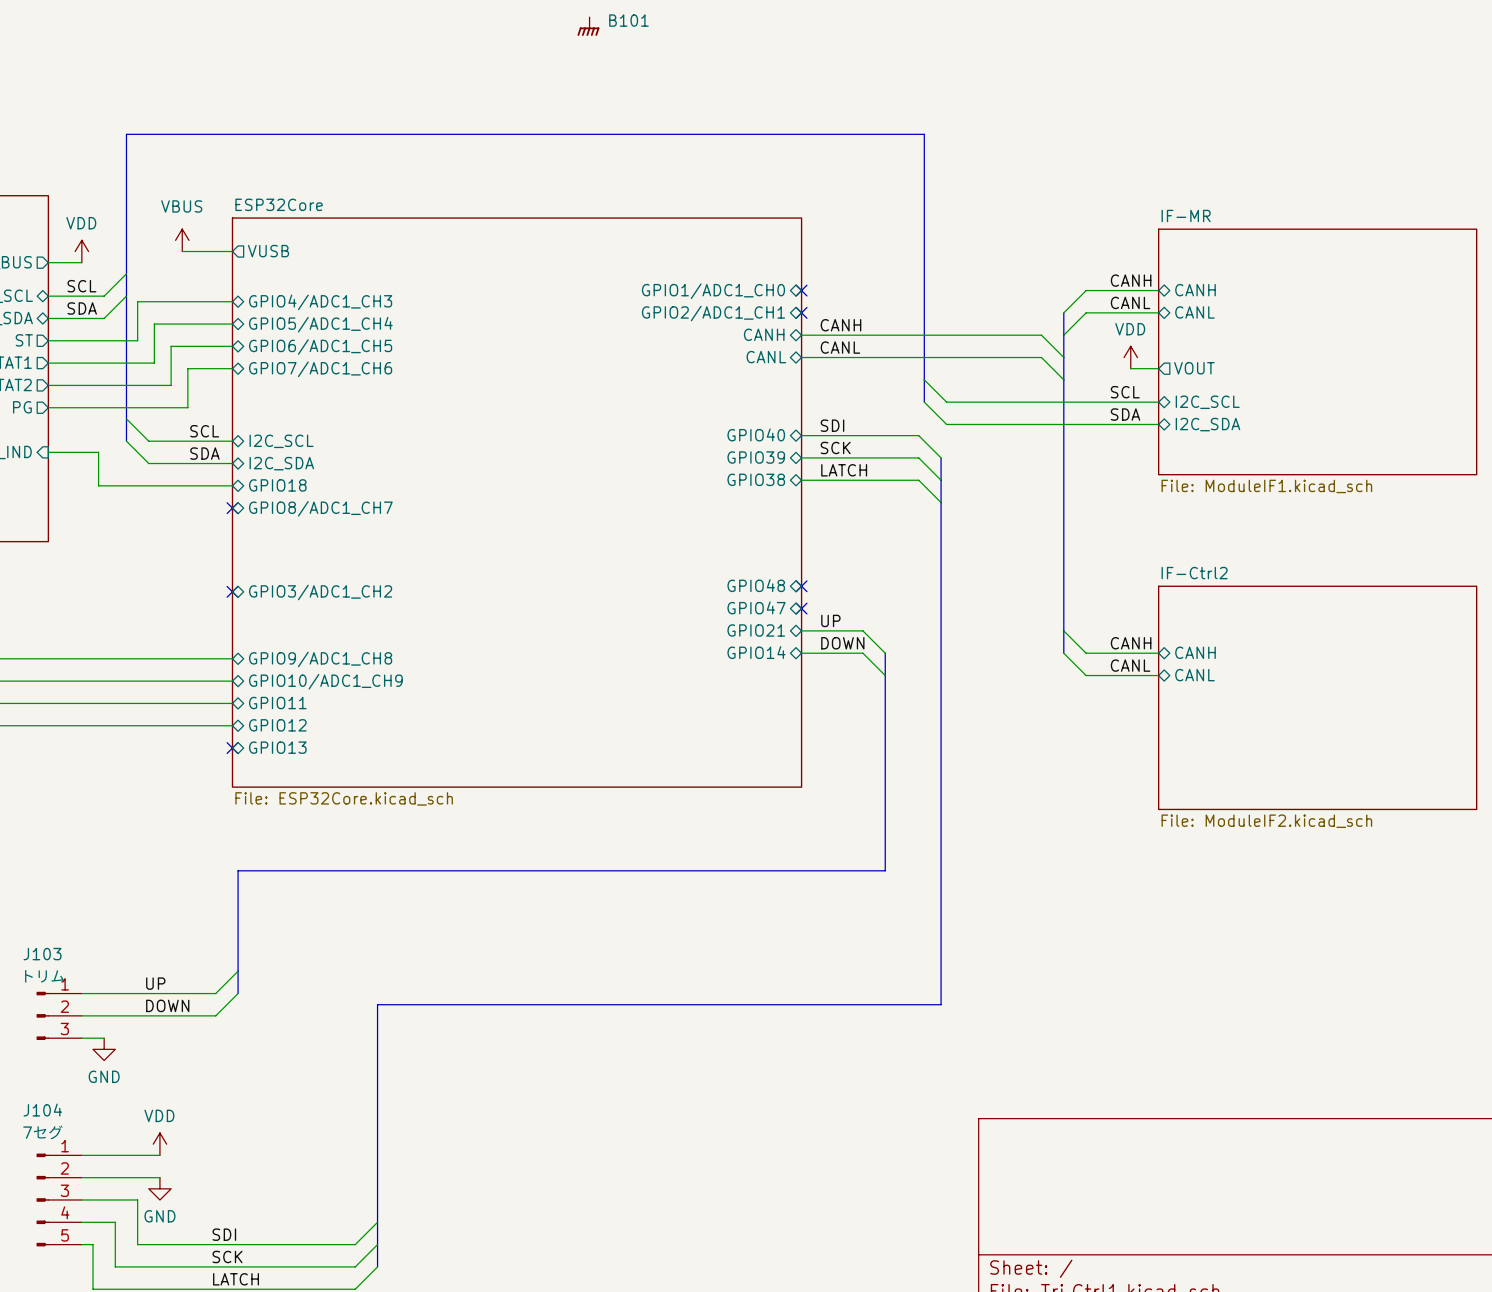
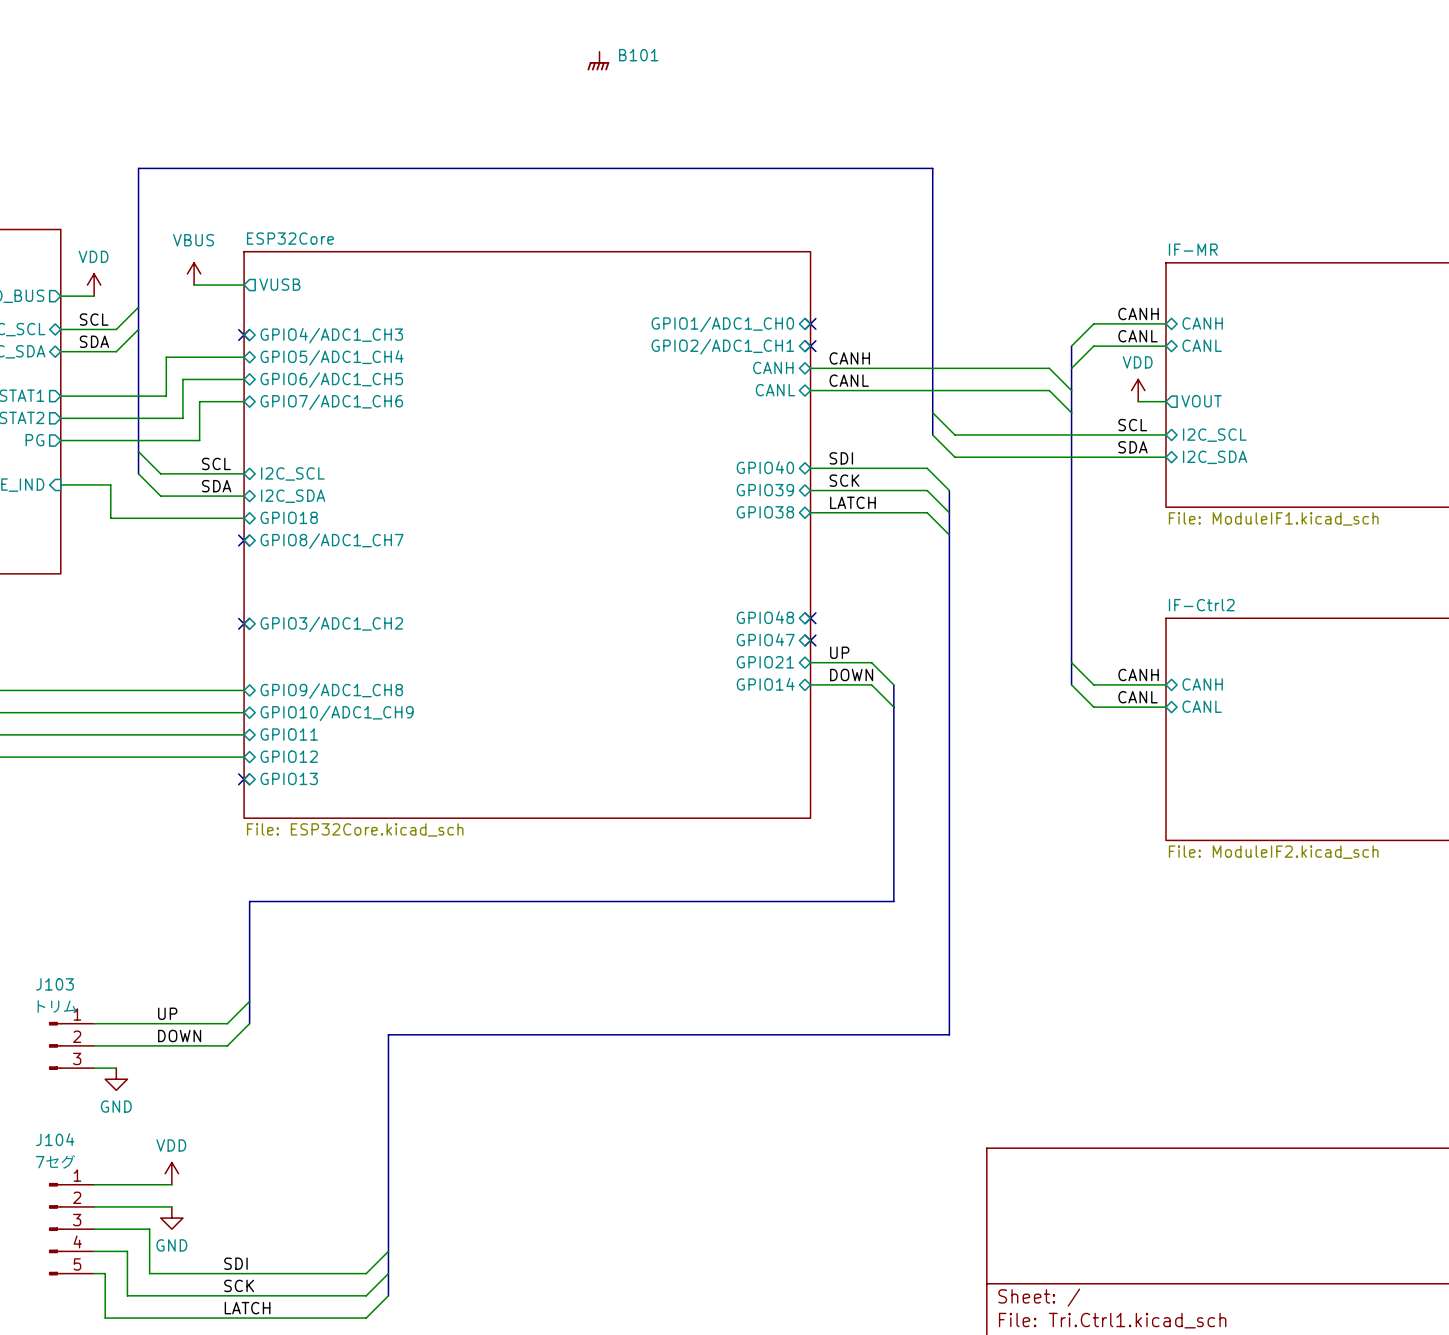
wire: (232, 301) (137, 301) (137, 340) (48, 340) -> none
no-connect mark: none -> (244, 335)
sheet pin: ST (24, 340) -> none

